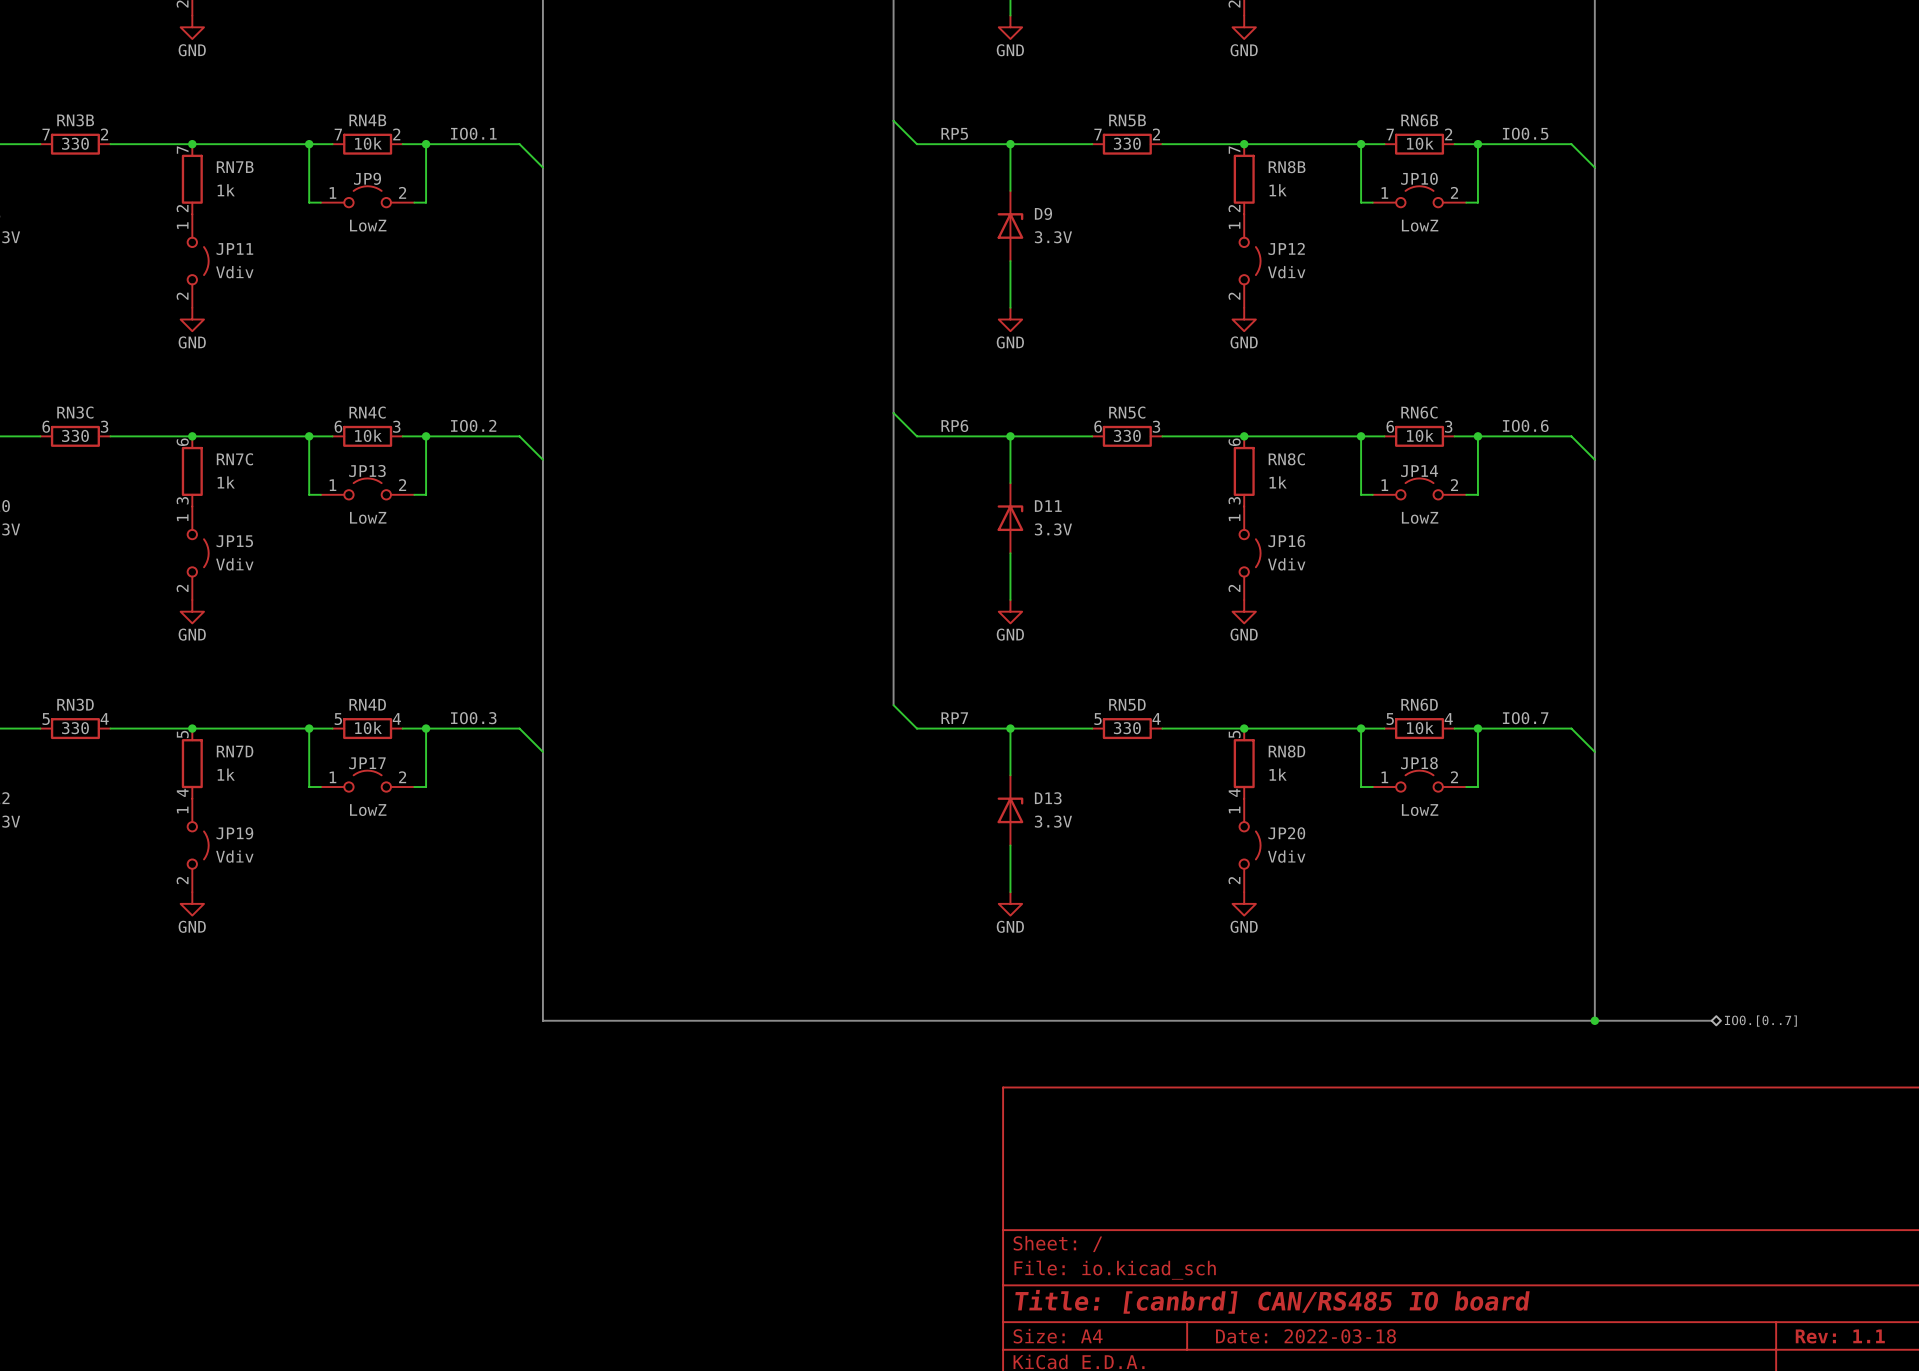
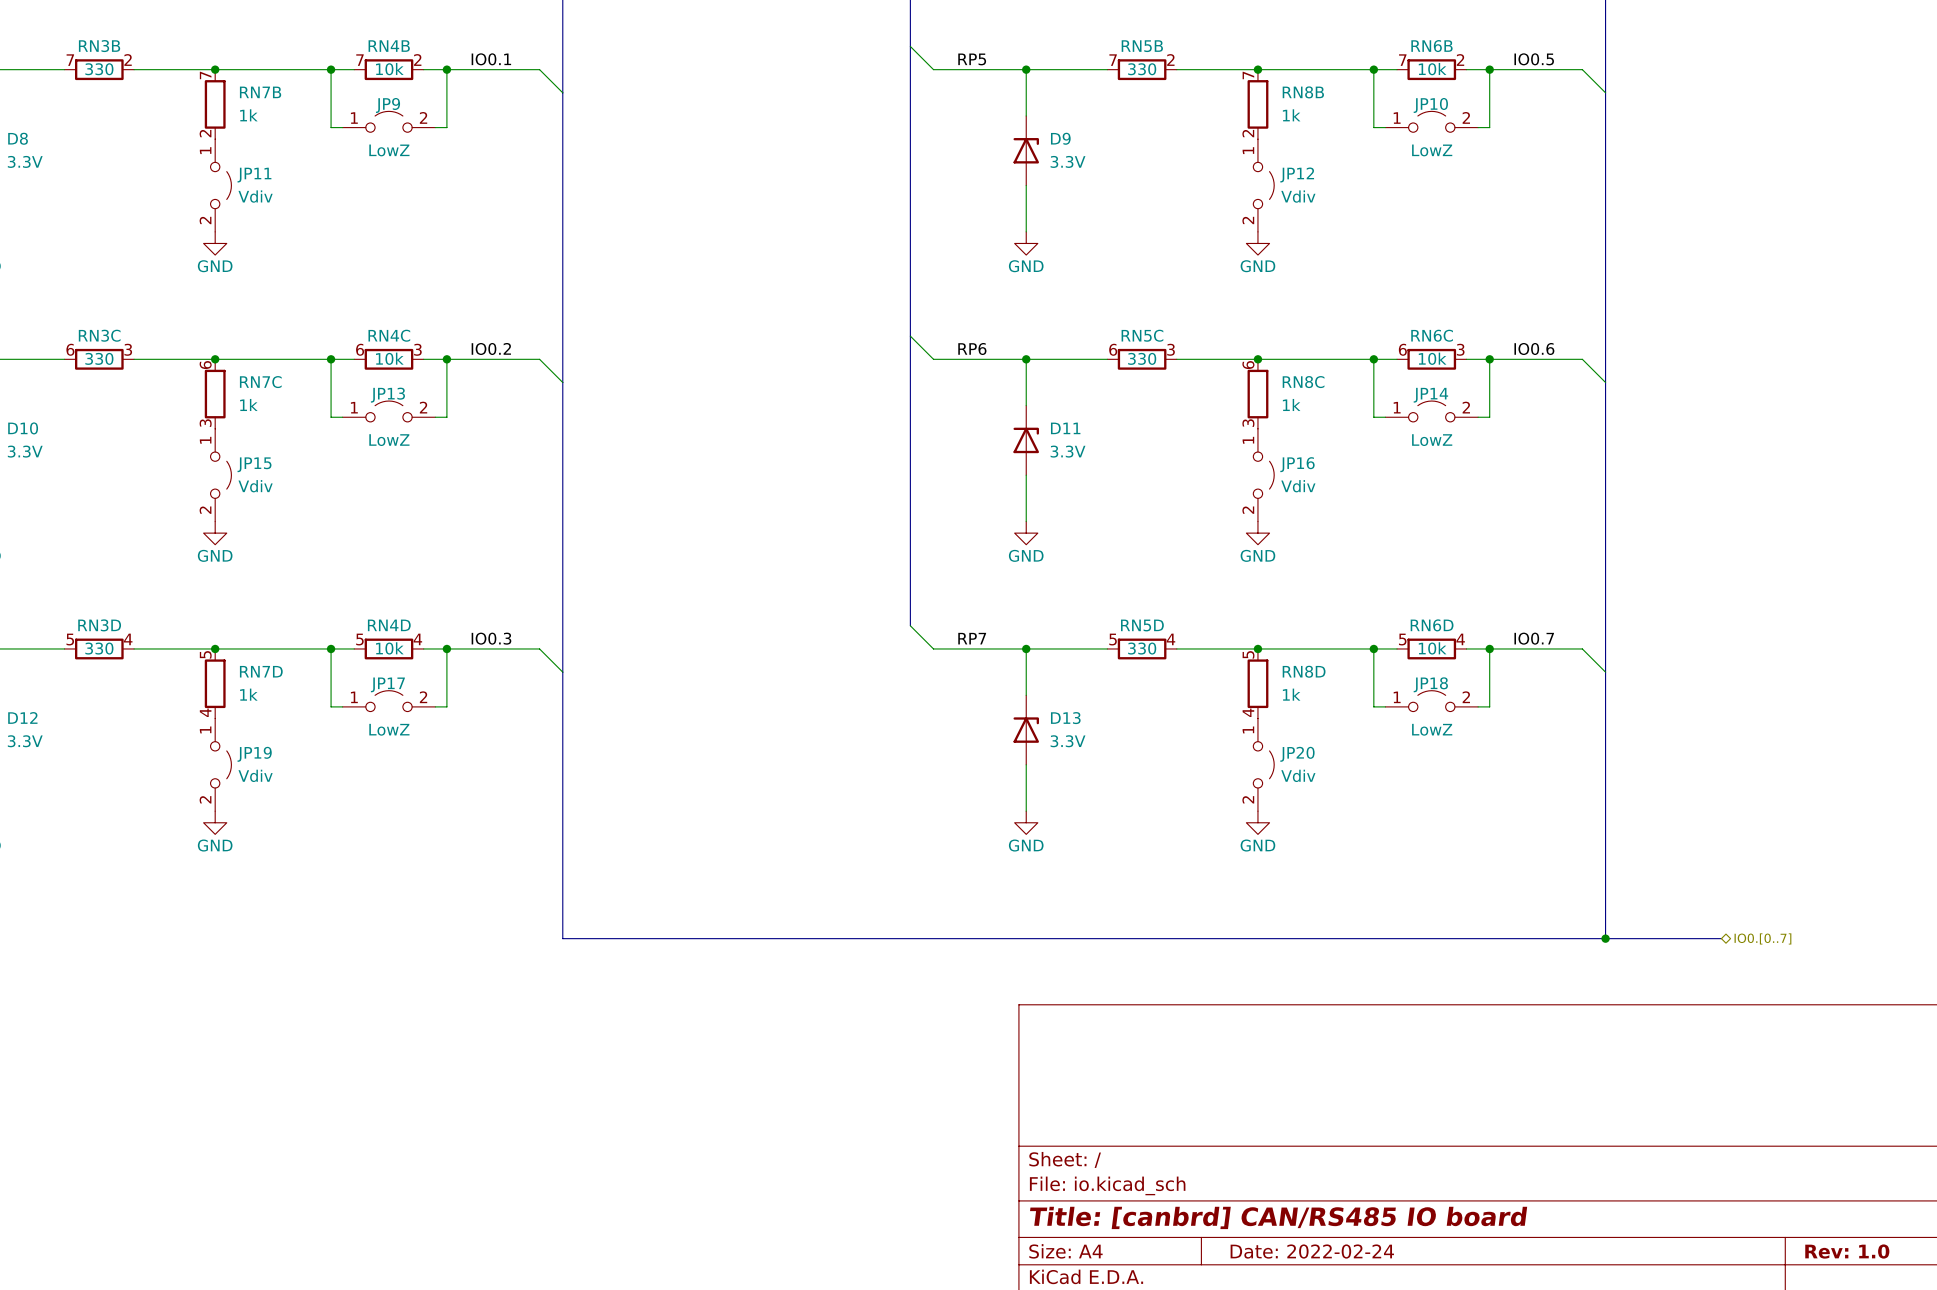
title block: Date: 2022-03-18 (1305, 1336) -> Date: 2022-02-24 (1312, 1251)
title block: Rev: 1.1 (1840, 1336) -> Rev: 1.0 (1847, 1251)

